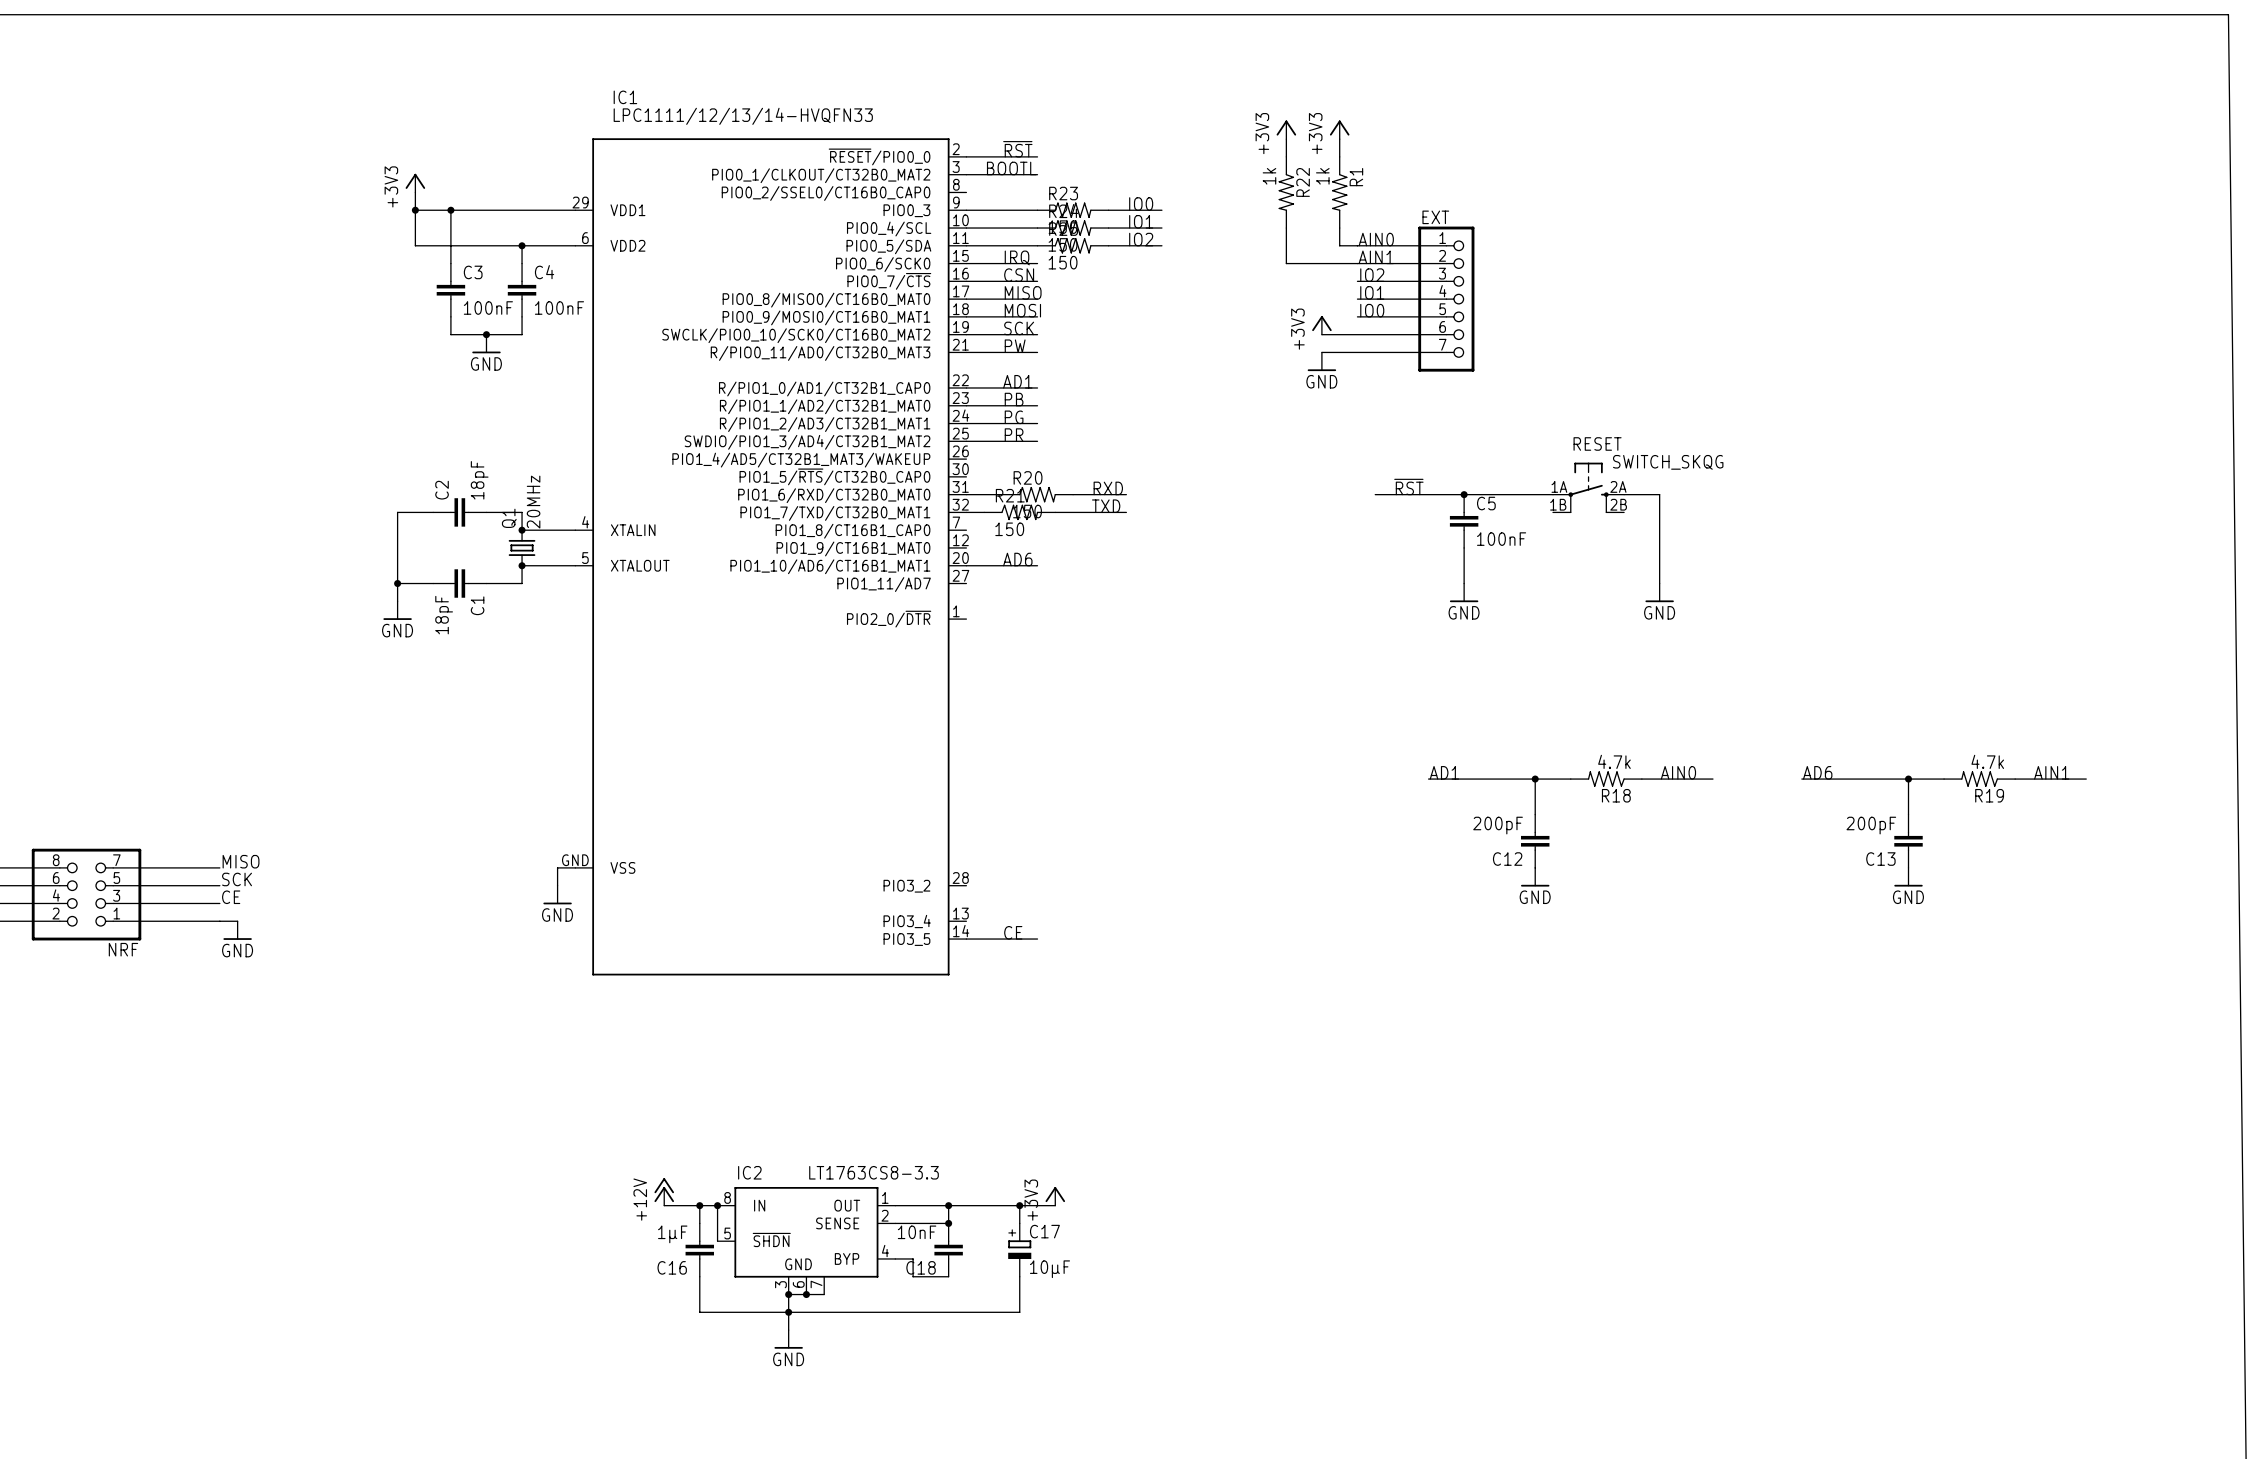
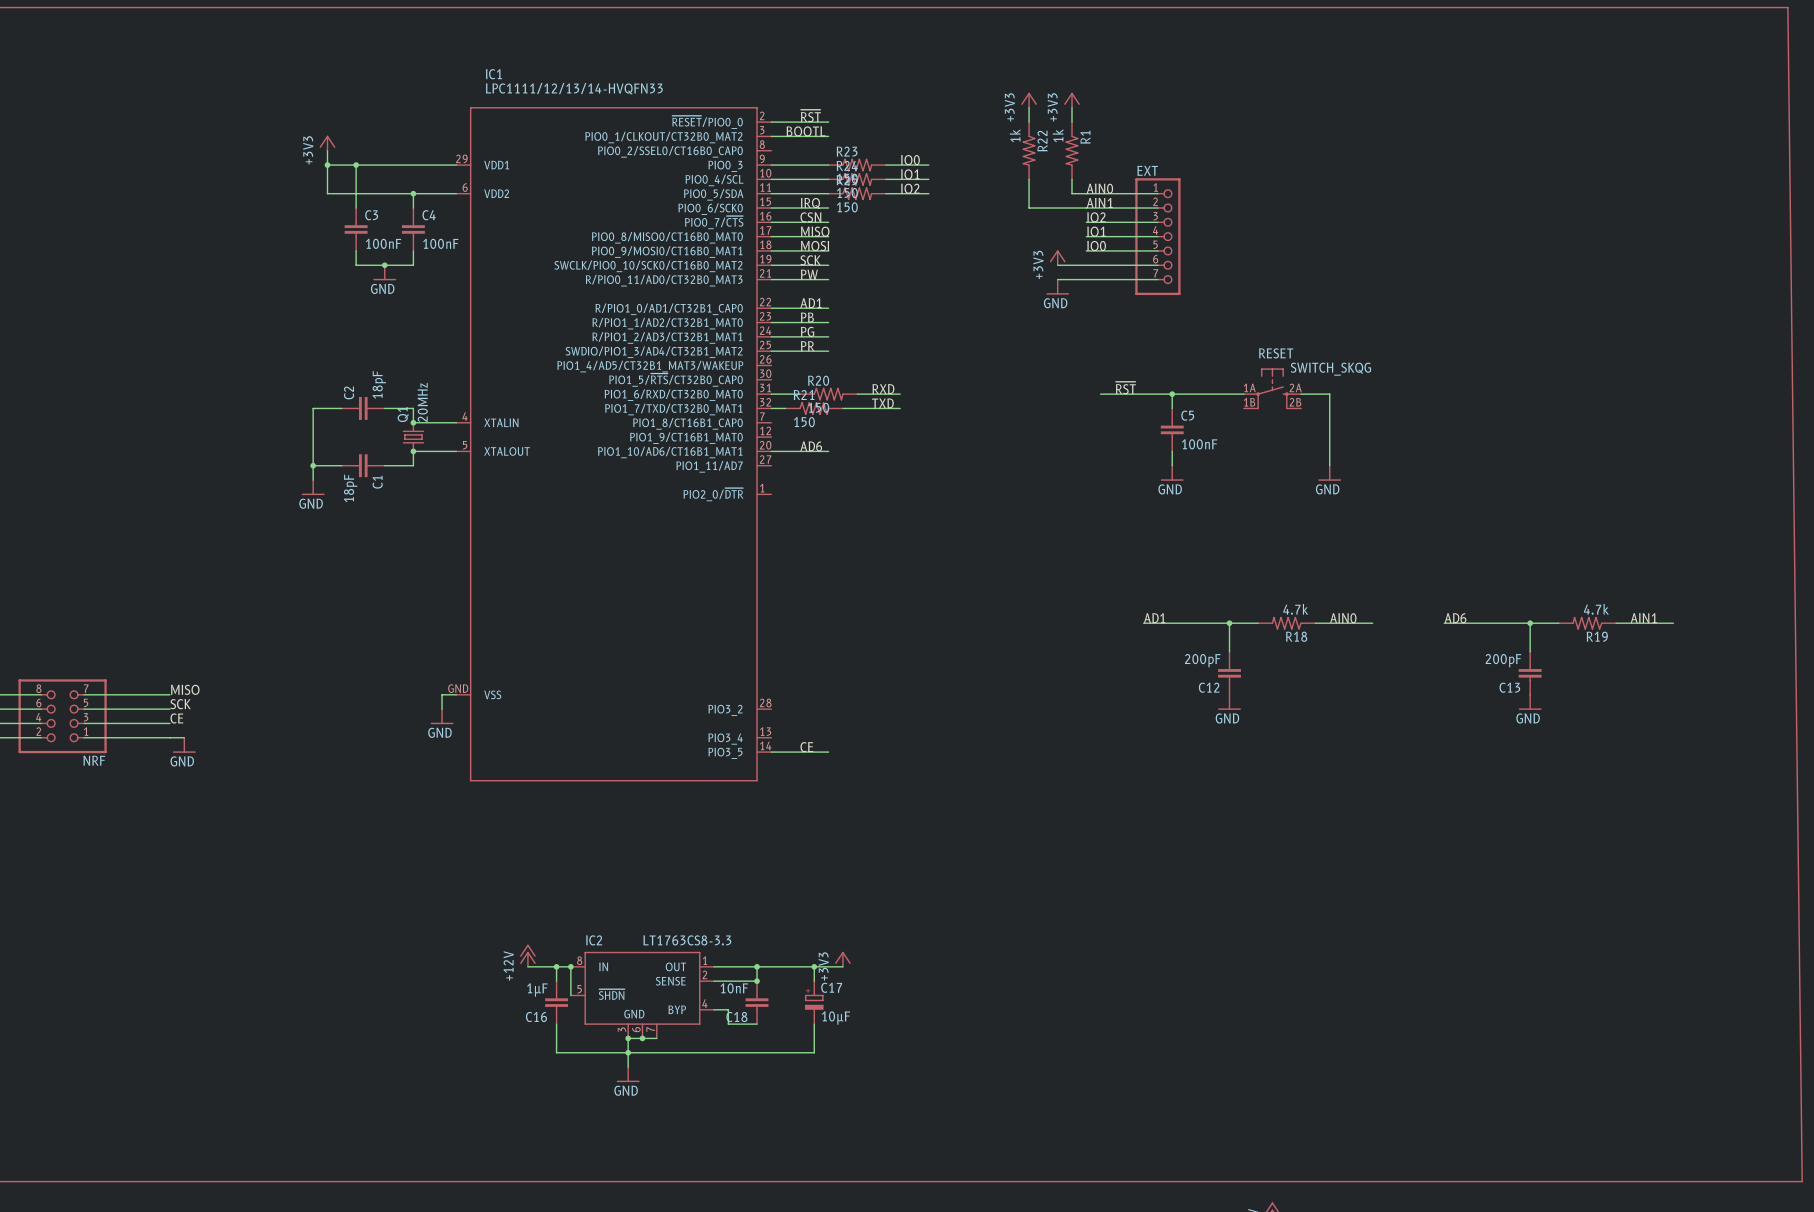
C5 position: (1464, 521) -> (1172, 429)

